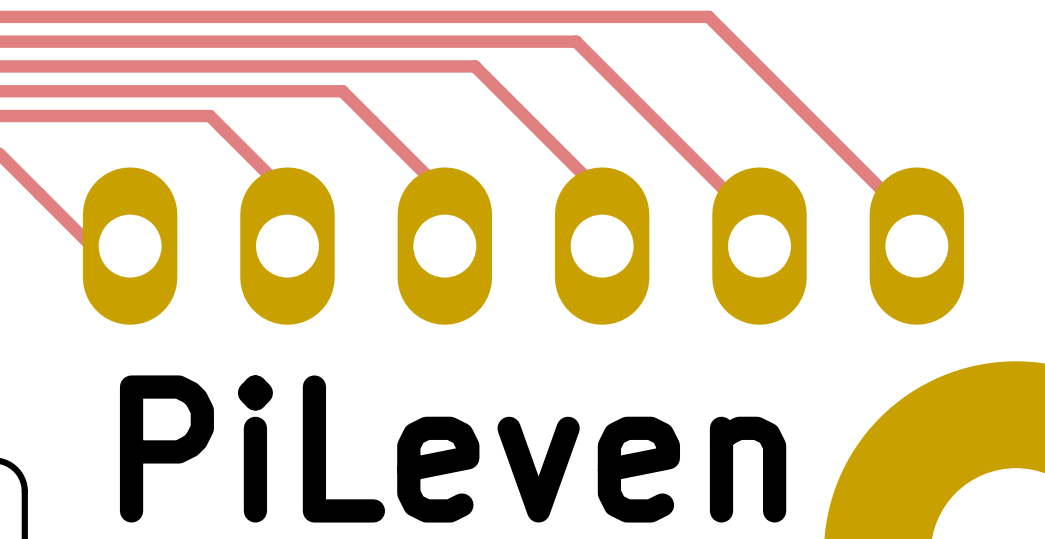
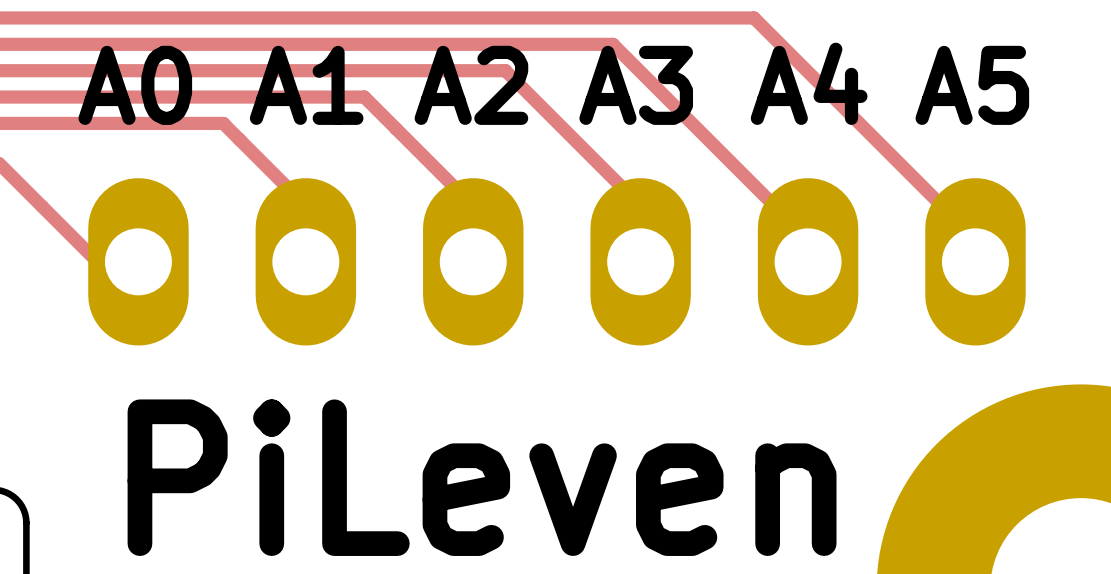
text: none -> A4 (809, 83)
text: none -> A0 (135, 85)
text: none -> A1 (306, 85)
text: none -> A2 (471, 85)
text: none -> A3 (636, 85)
text: none -> A5 (972, 85)

